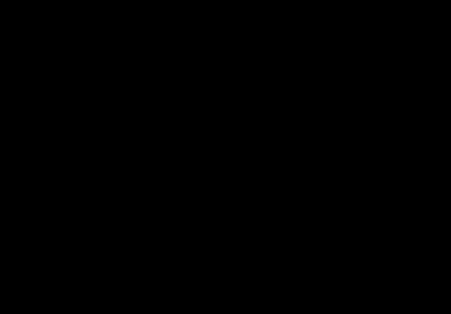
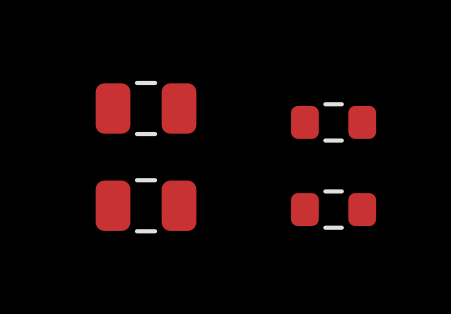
part: none -> (146, 108)
part: none -> (333, 122)
part: none -> (146, 205)
part: none -> (333, 209)

